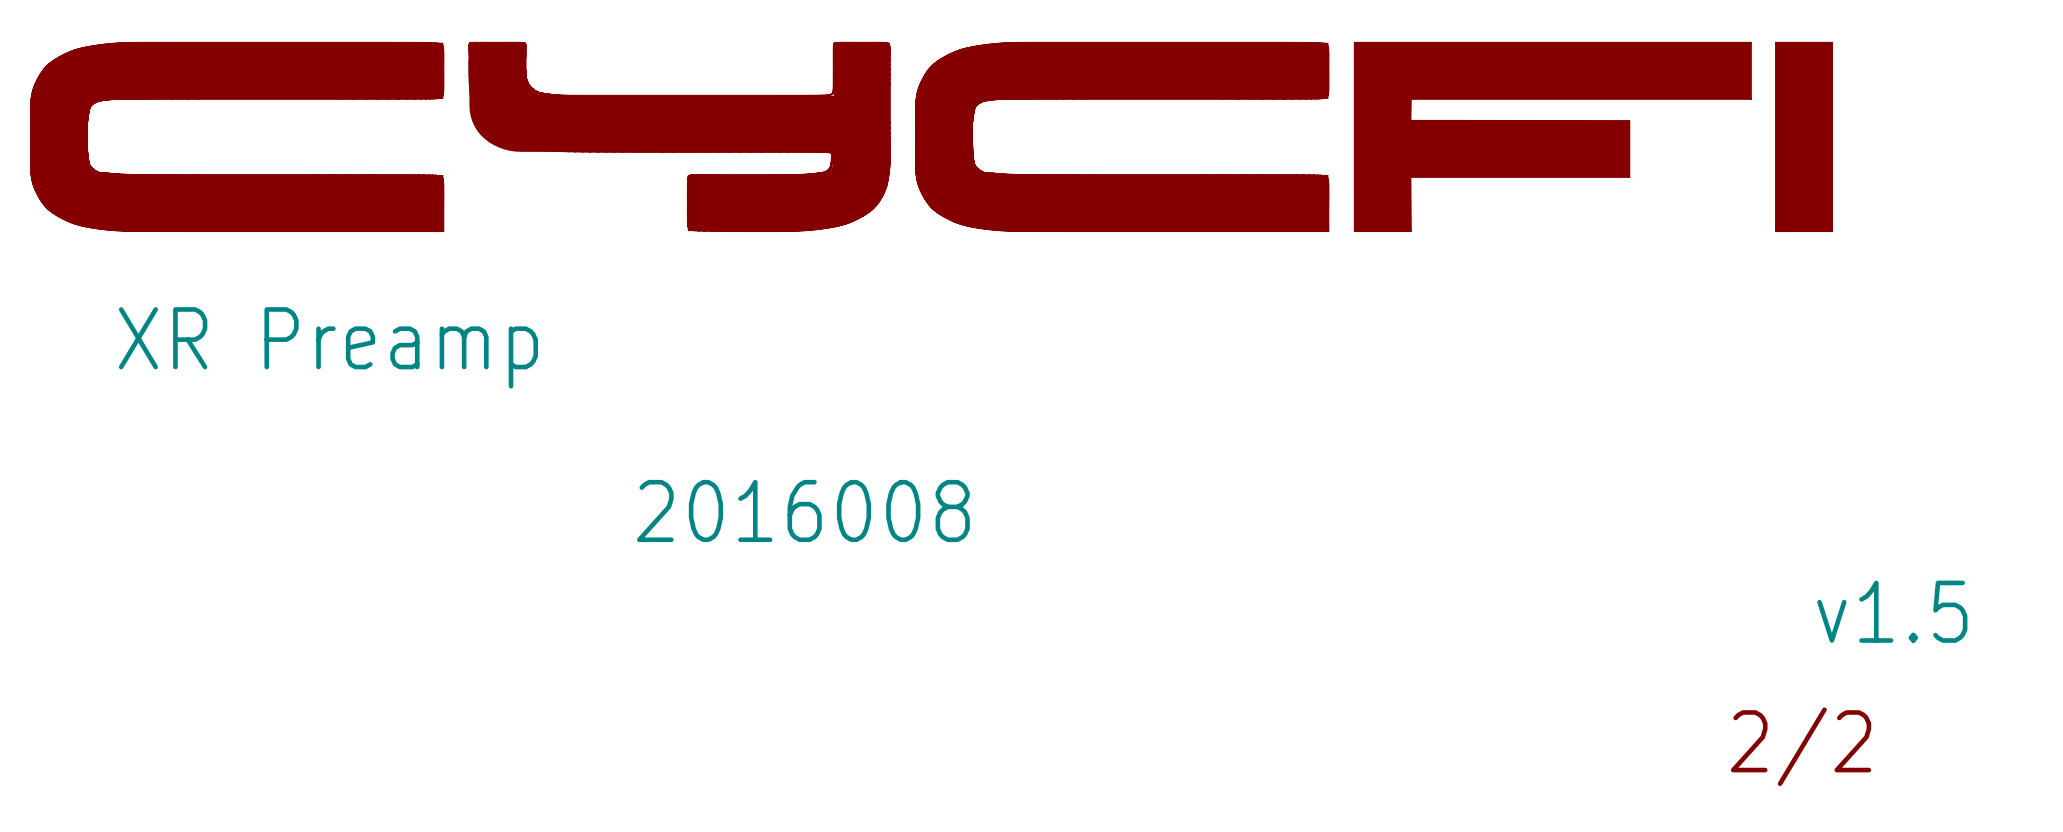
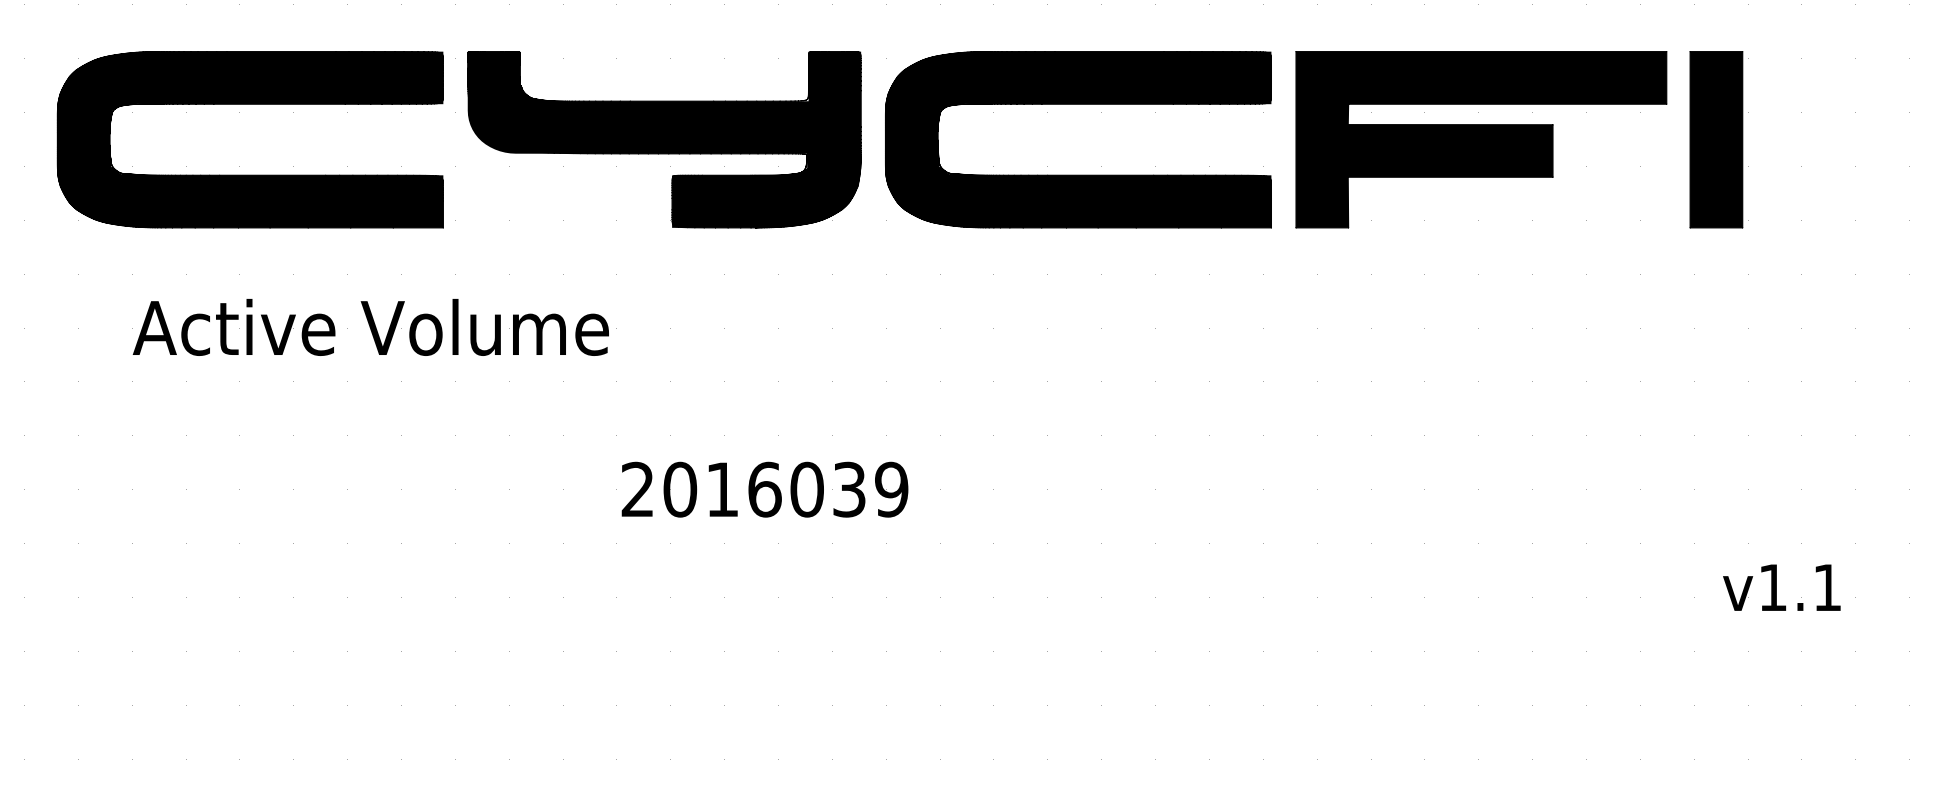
text: XR Preamp (328, 347) -> Active Volume (370, 327)
text: 2016008 (803, 510) -> 2016039 (765, 489)
text: v1.5 (1892, 611) -> v1.1 (1781, 587)
text: 2/2 (1801, 746) -> none

